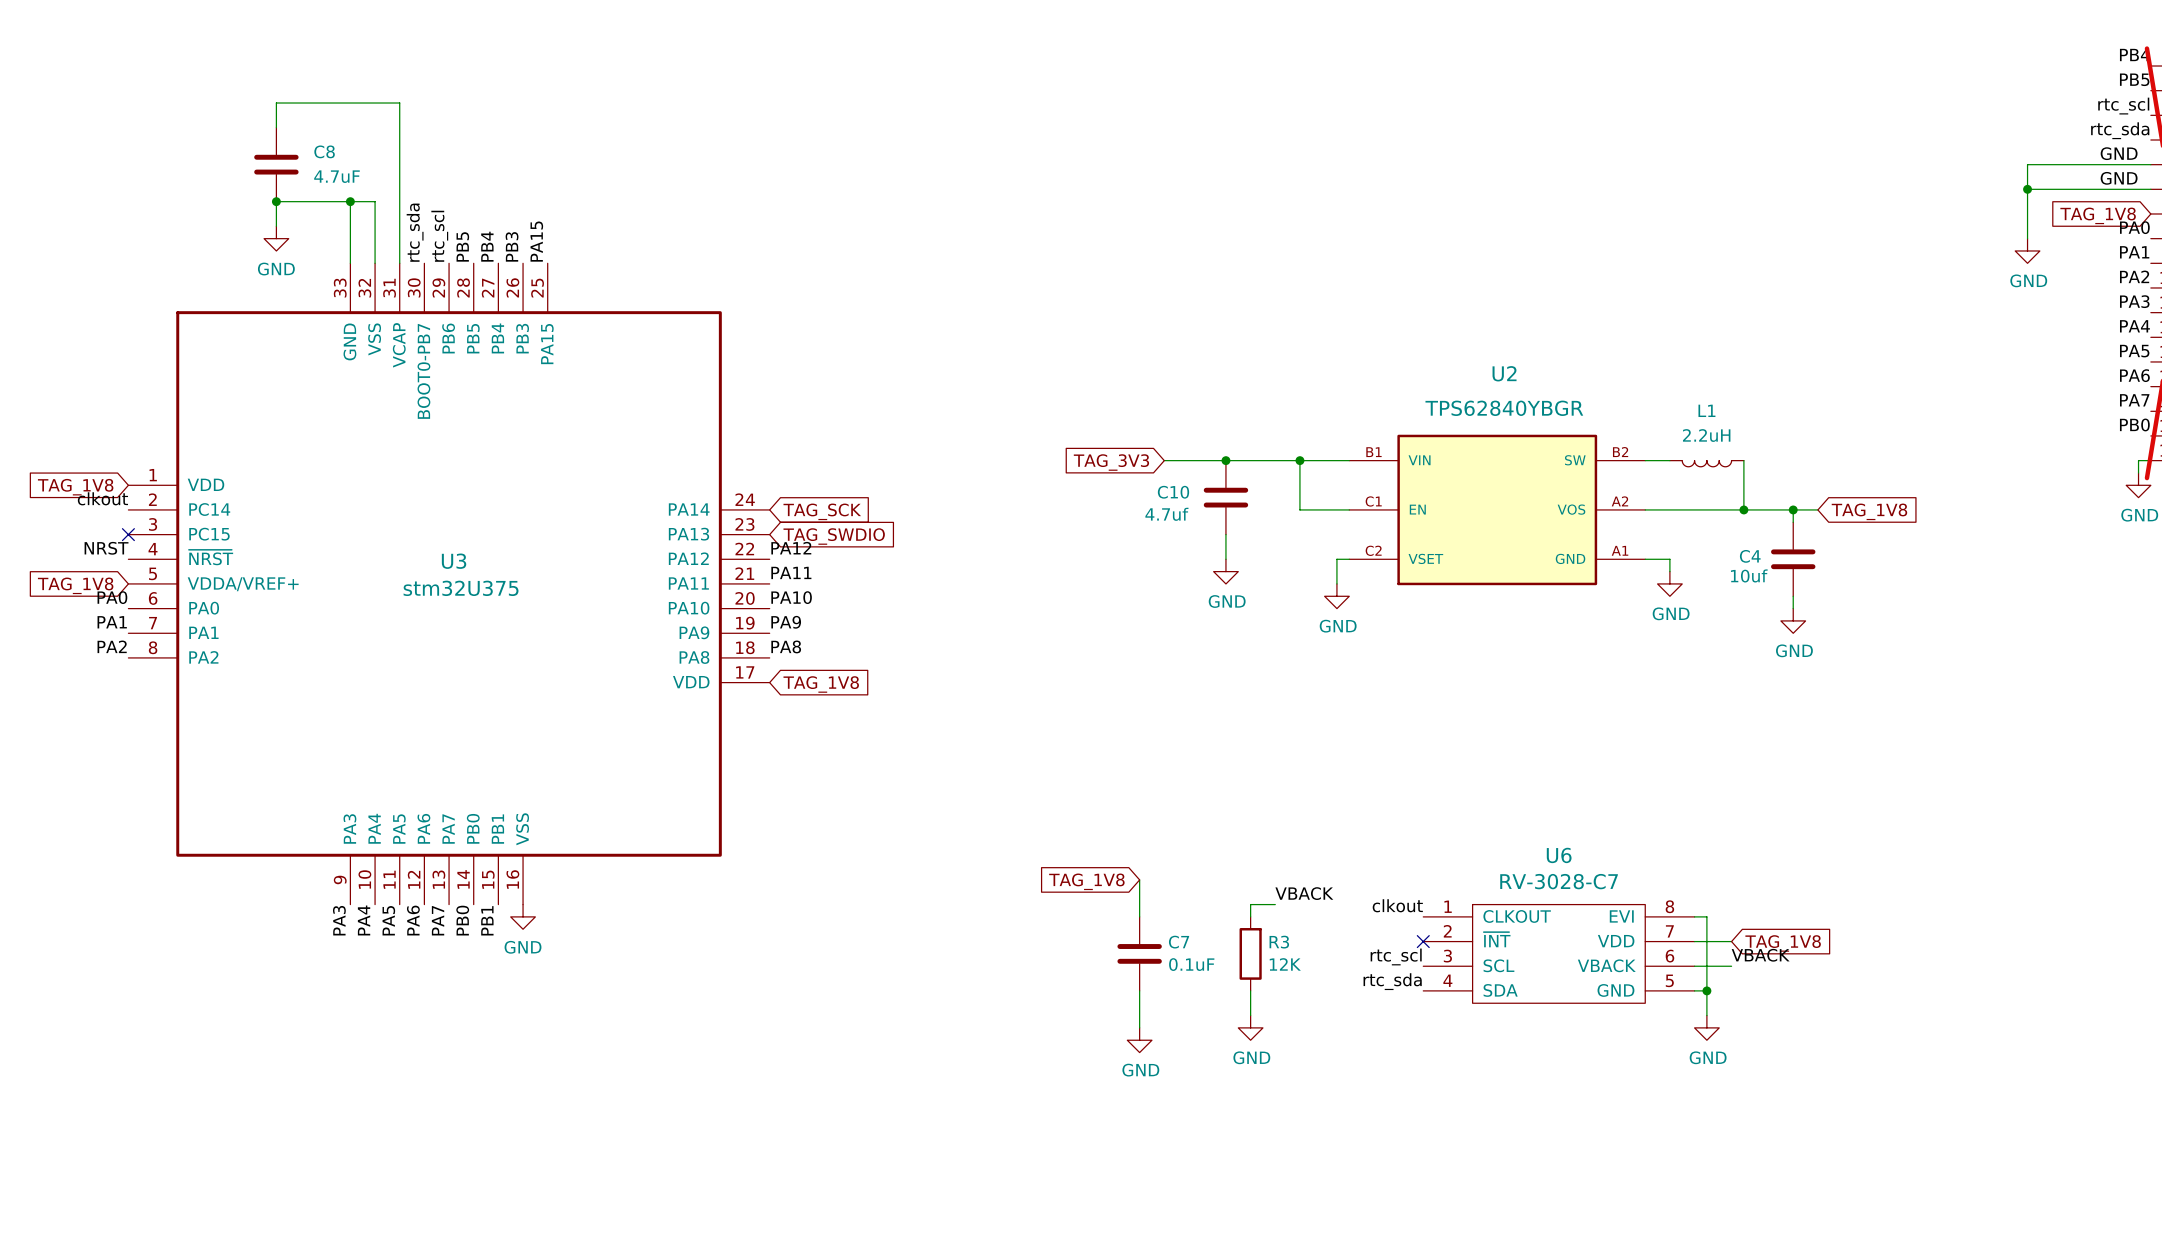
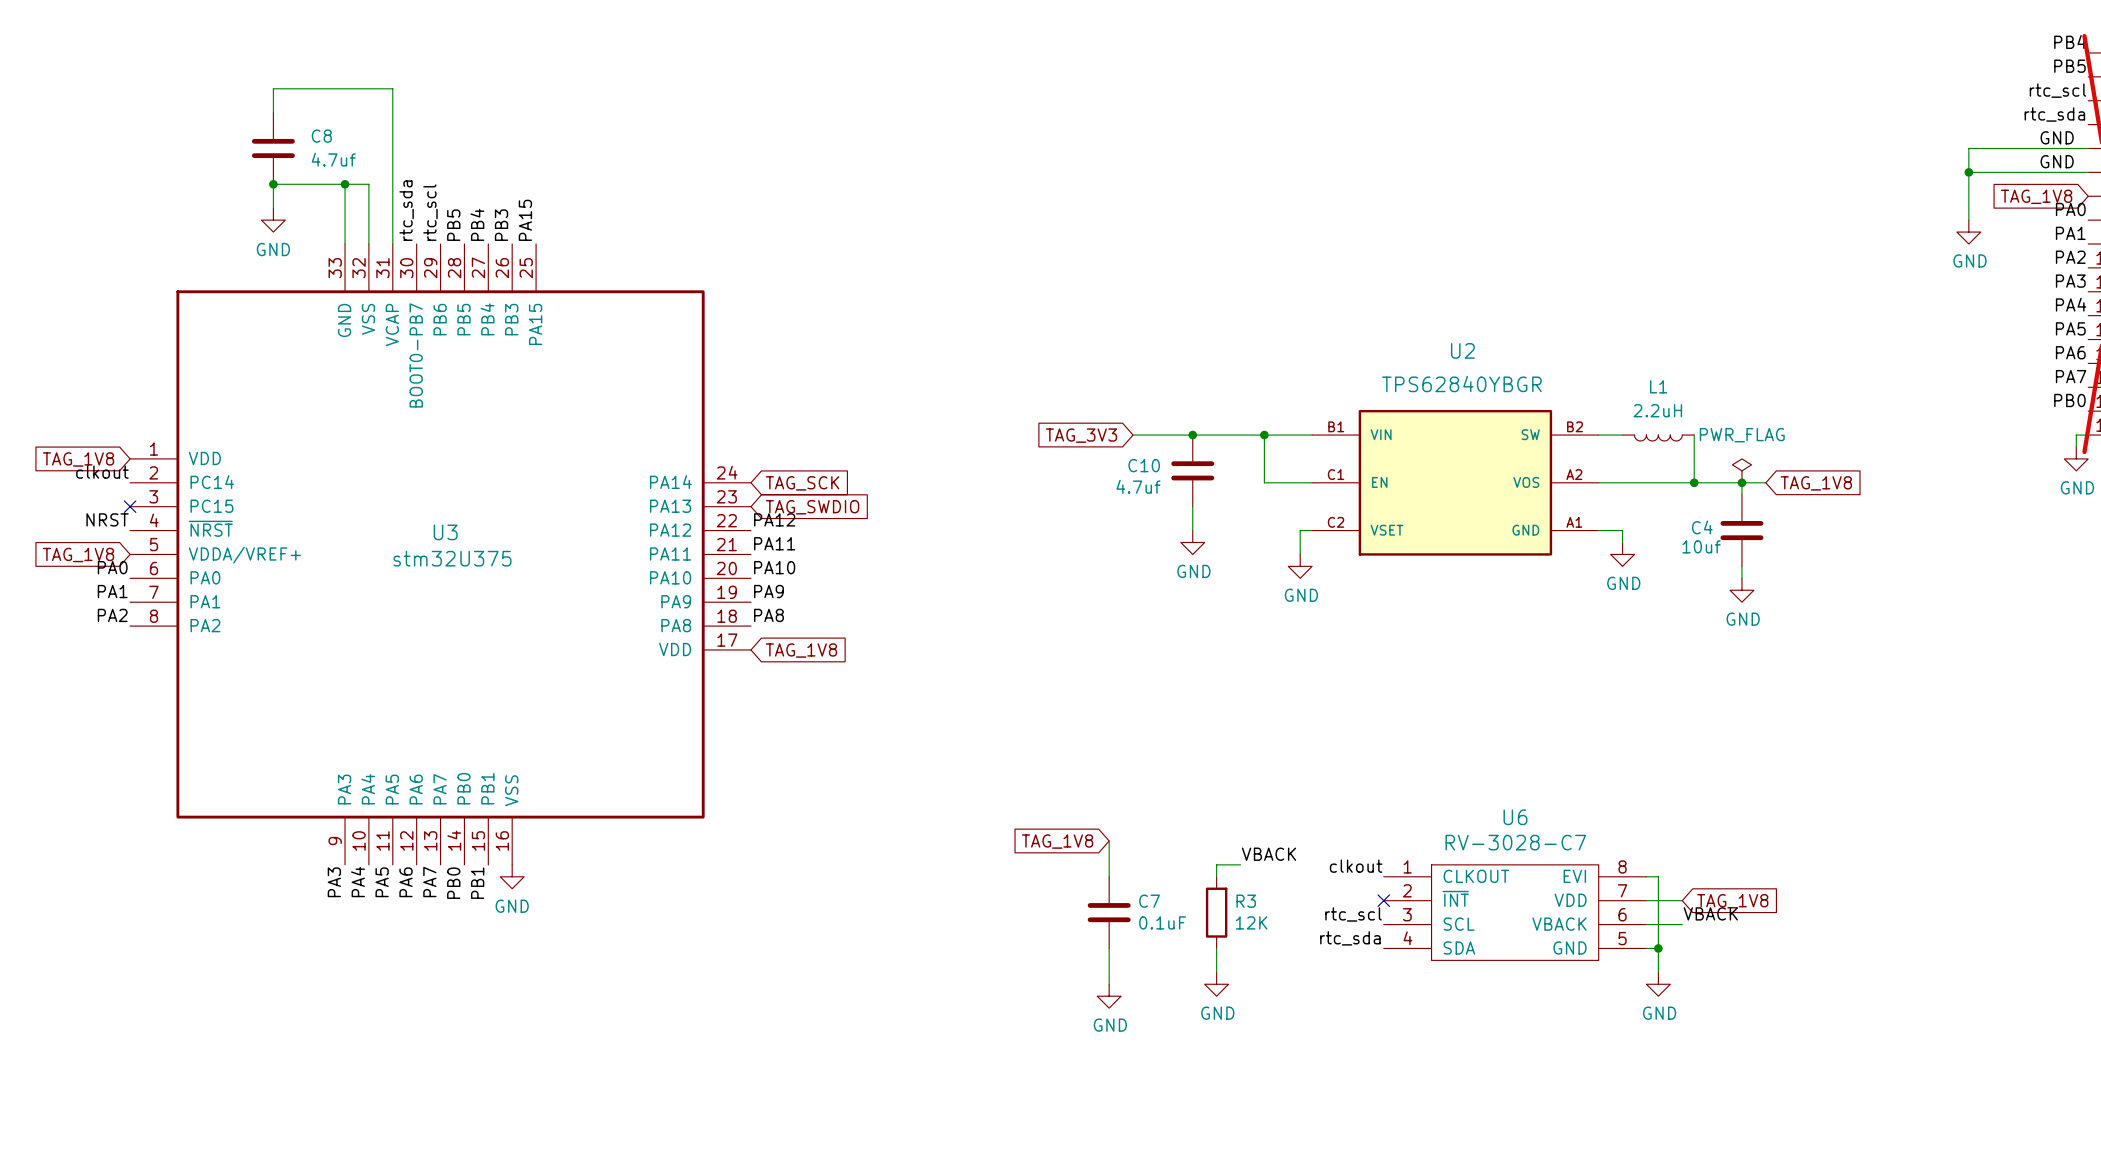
C8 value: 4.7uF (336, 176) -> 4.7uf (333, 159)
power symbol: none -> PWR_FLAG (1741, 470)

